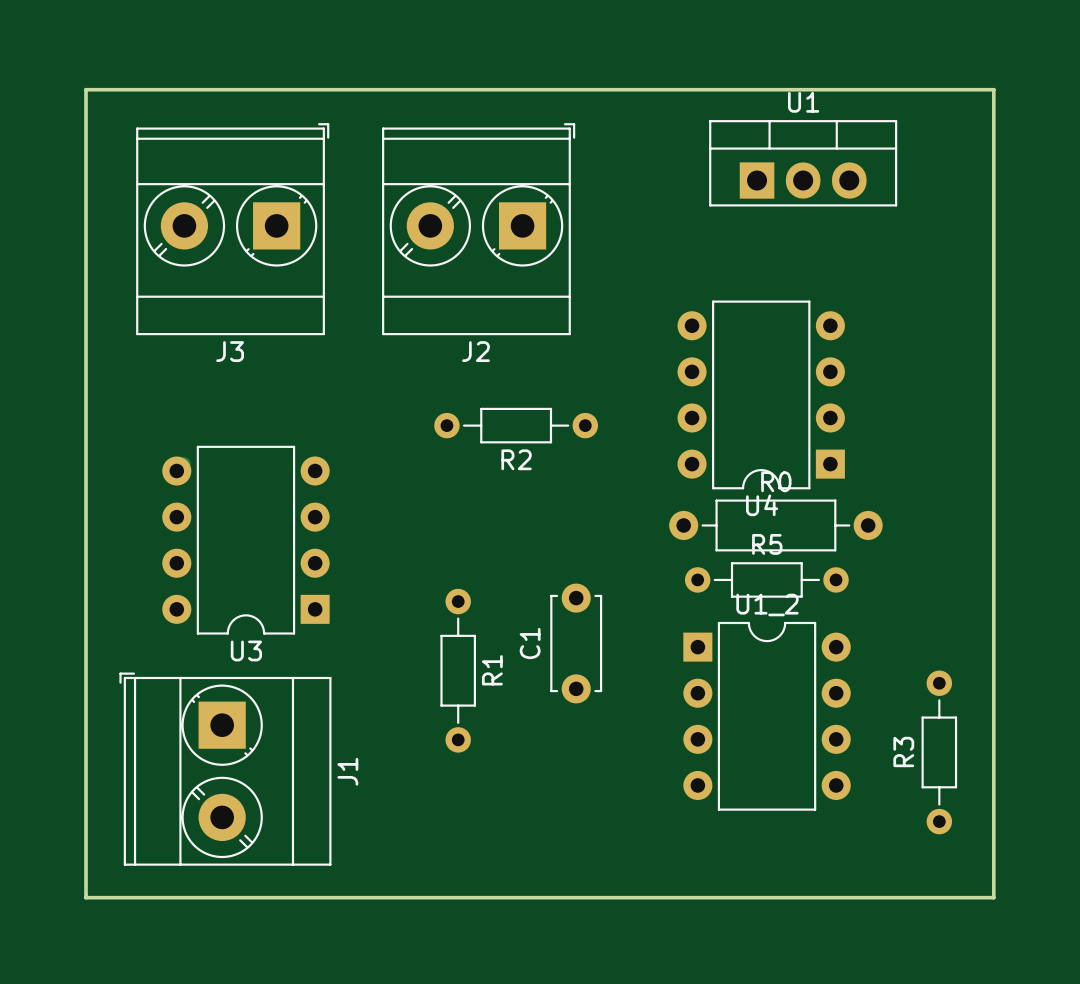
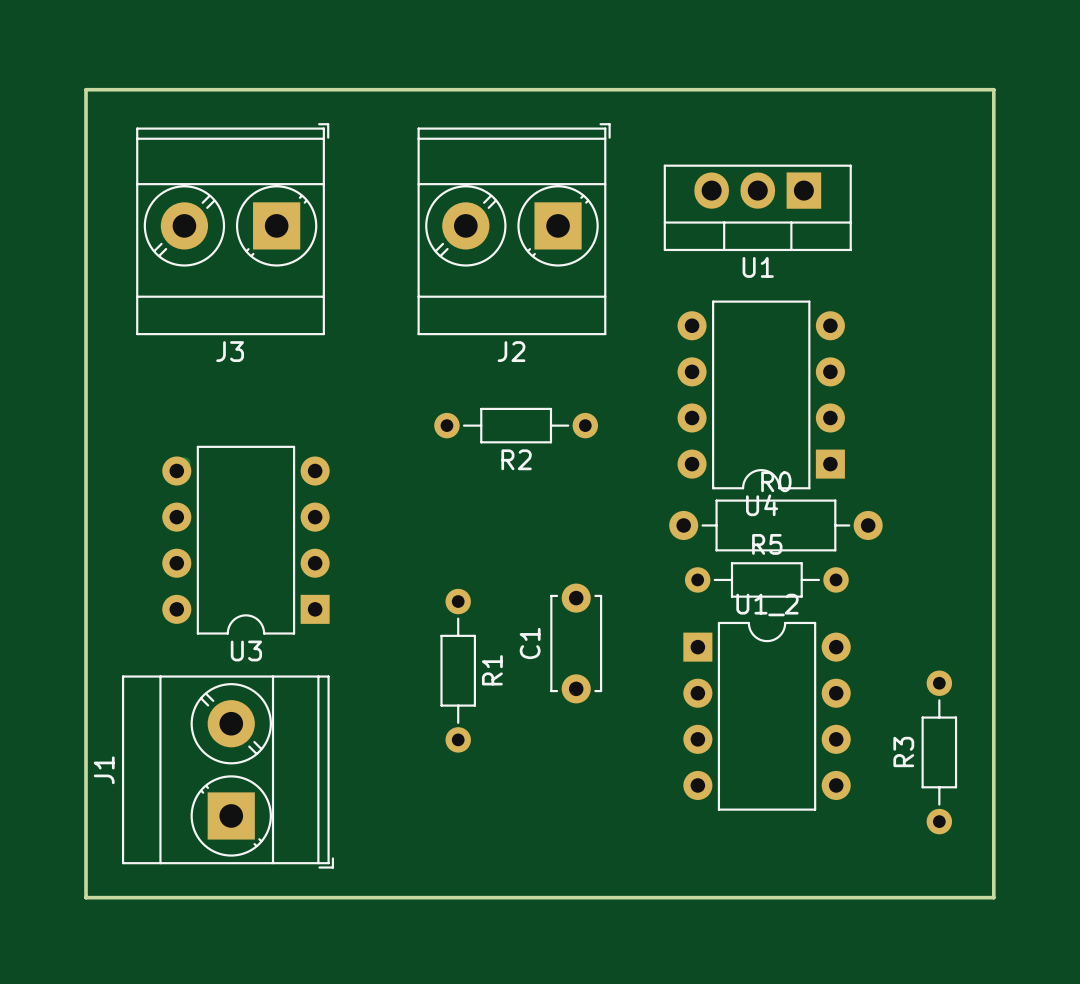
U1 rotation: 0° (803, 163) -> 180° (757, 207)
J2 position: (478, 229) -> (514, 229)
J1 rotation: 0° (225, 769) -> 180° (227, 772)

